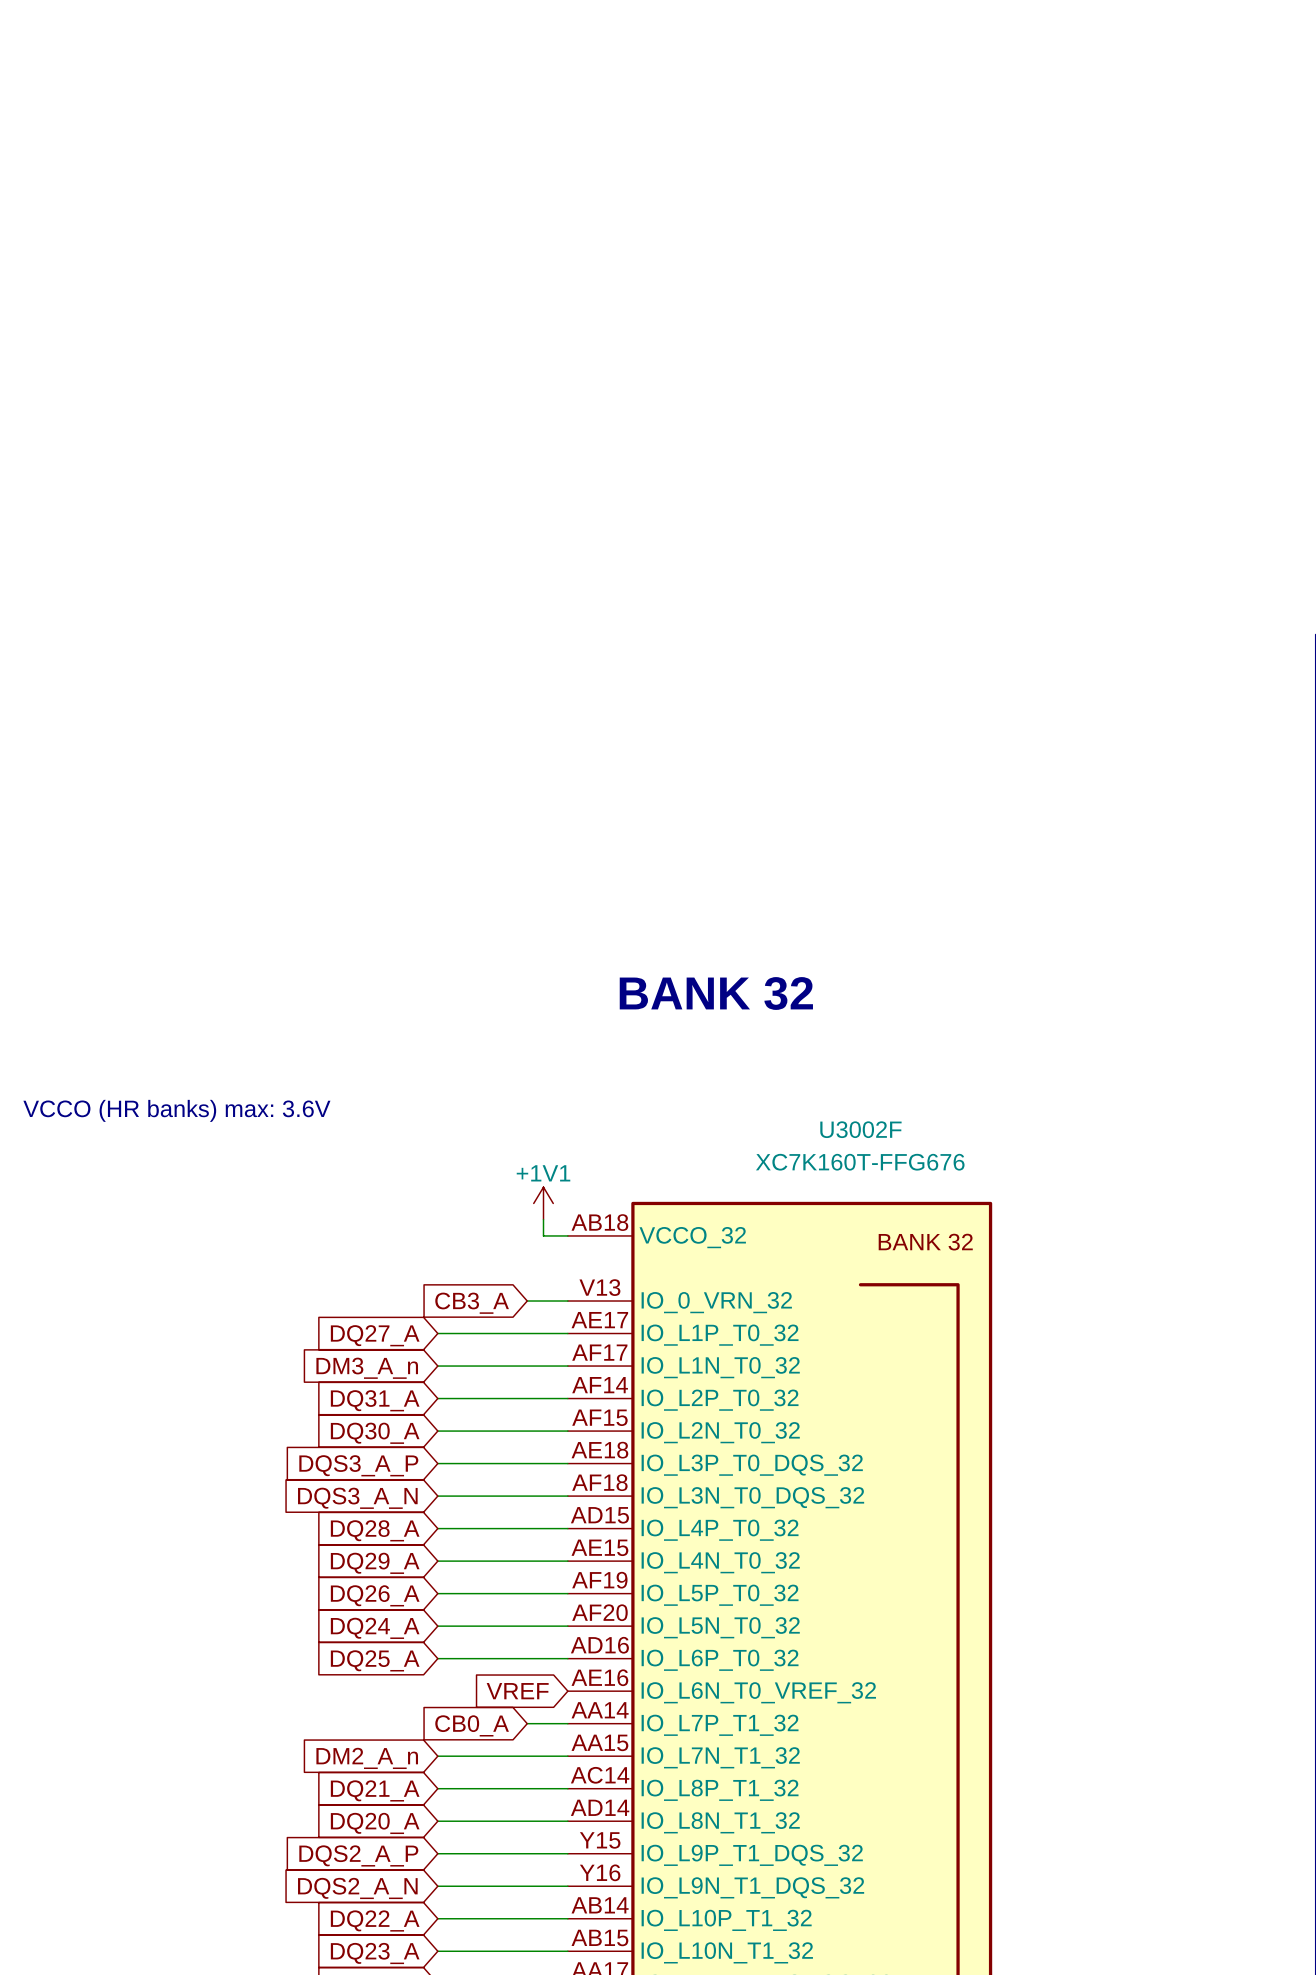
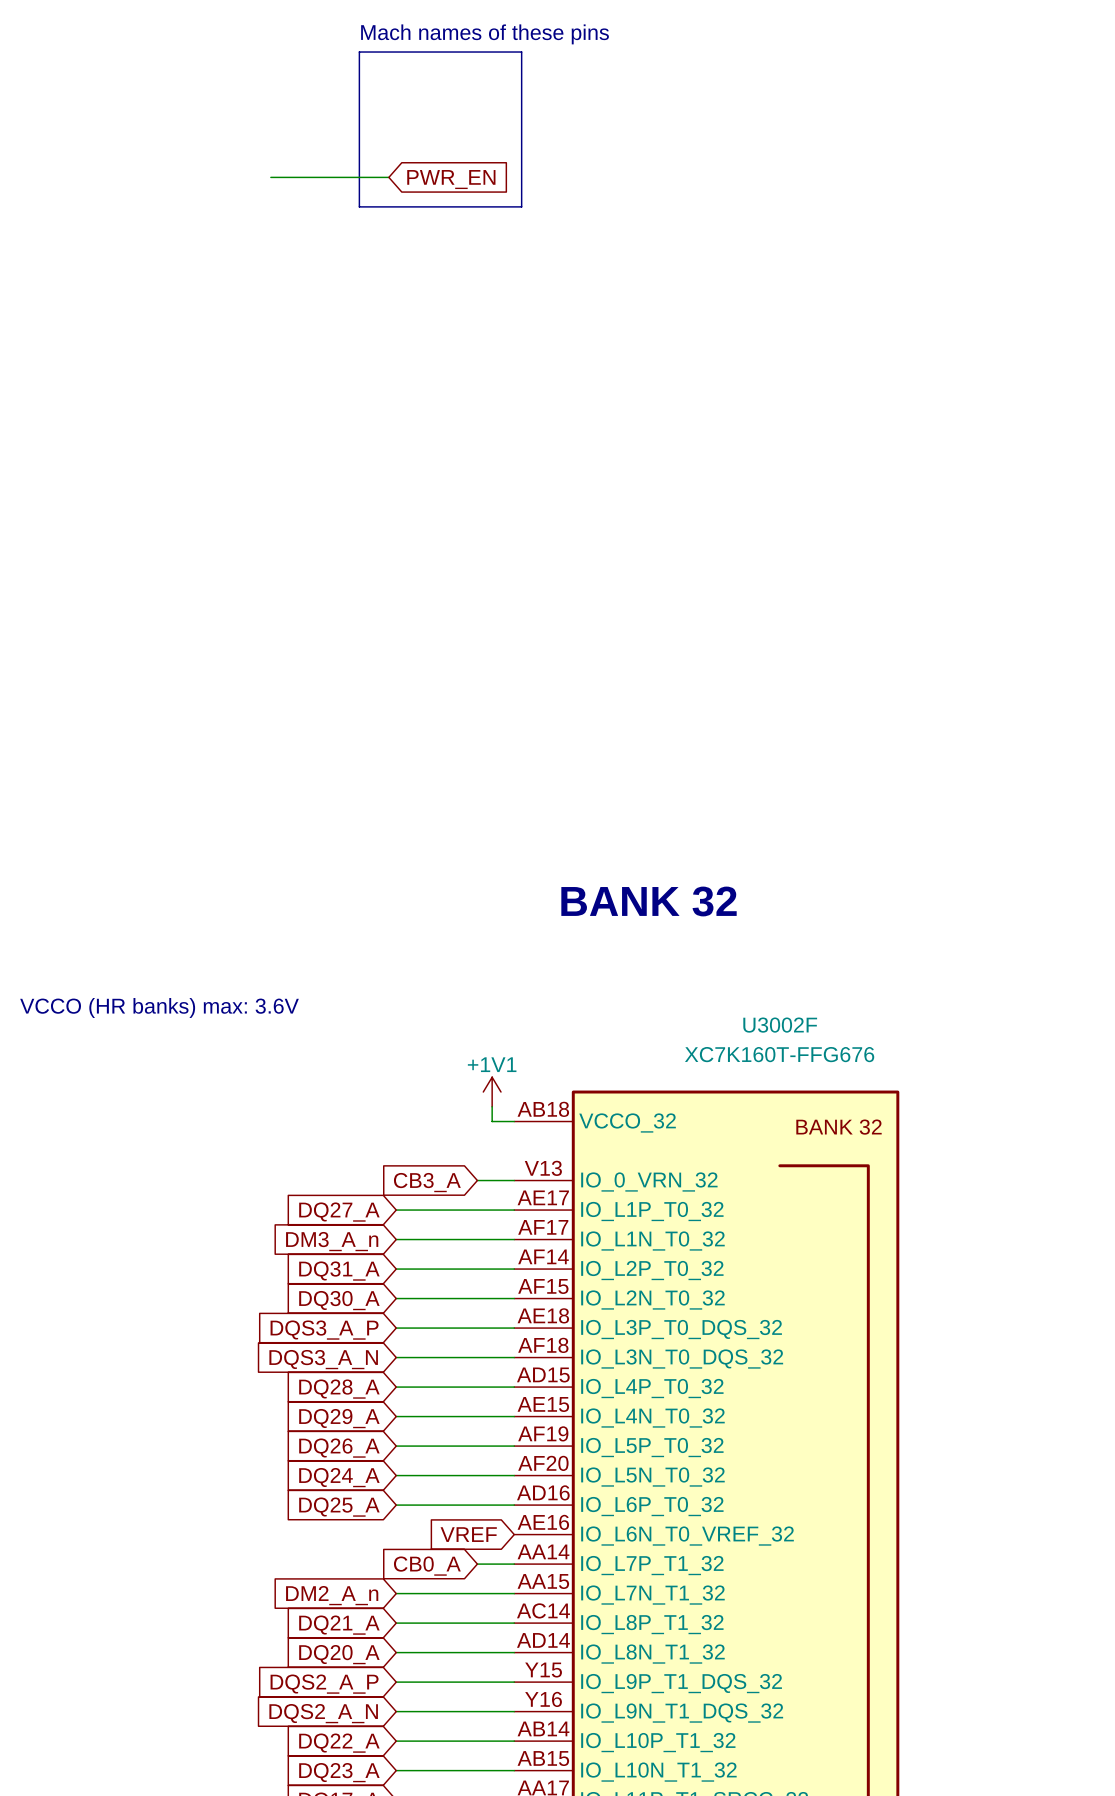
text: none -> Mach names of these pins (485, 34)
line: none -> (359, 52) (521, 52) (521, 206) (359, 206) (359, 52)
wire: none -> (270, 177) (388, 177)
global label: none -> PWR_EN (451, 179)

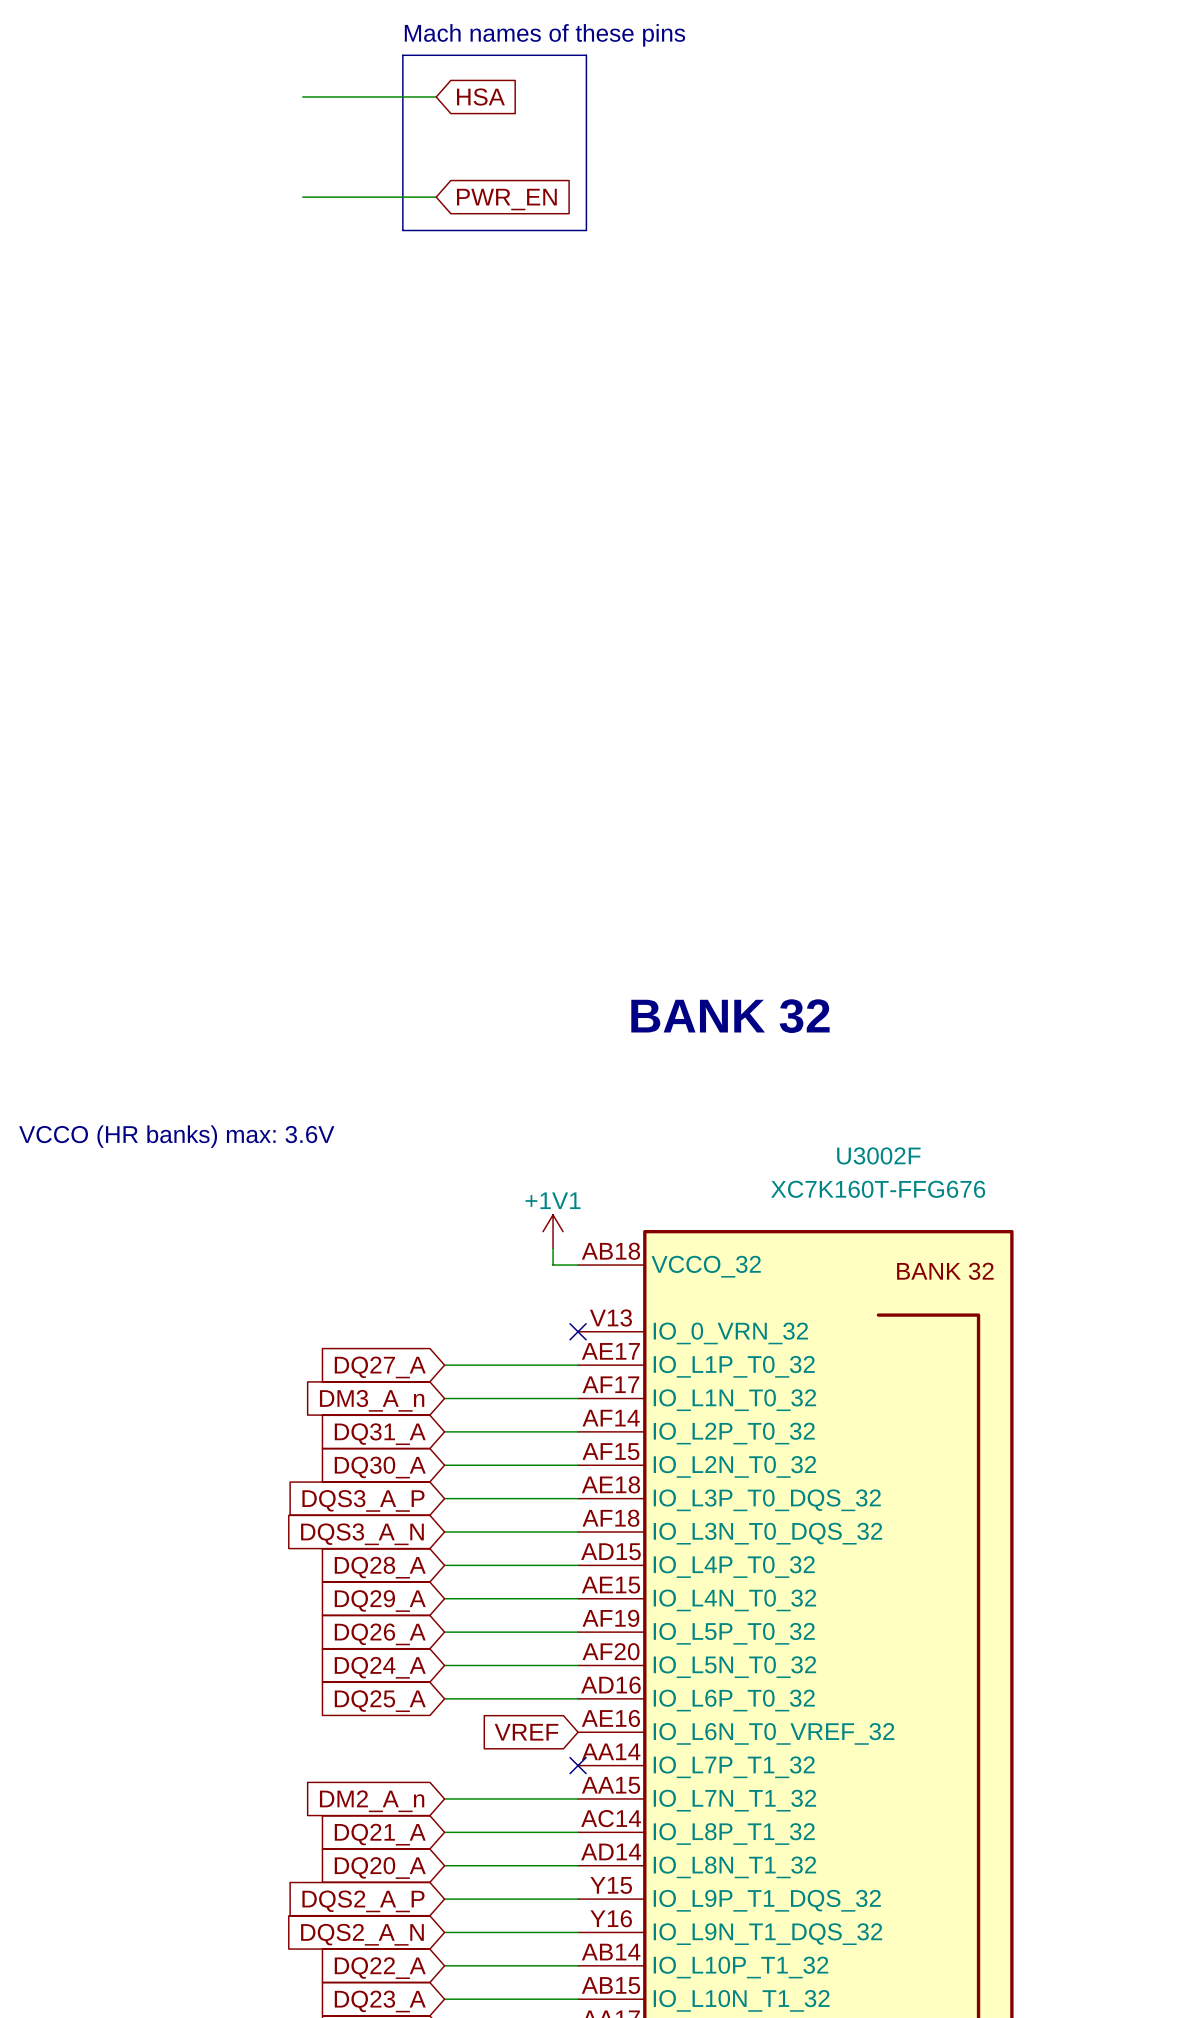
wire: none -> (302, 97) (436, 97)
global label: none -> HSA (480, 97)
wire: (477, 1180) (514, 1180) -> none
no-connect mark: none -> (578, 1331)
global label: CB3_A (427, 1182) -> none
wire: (477, 1564) (514, 1564) -> none
no-connect mark: none -> (578, 1765)
global label: CB0_A (427, 1566) -> none

